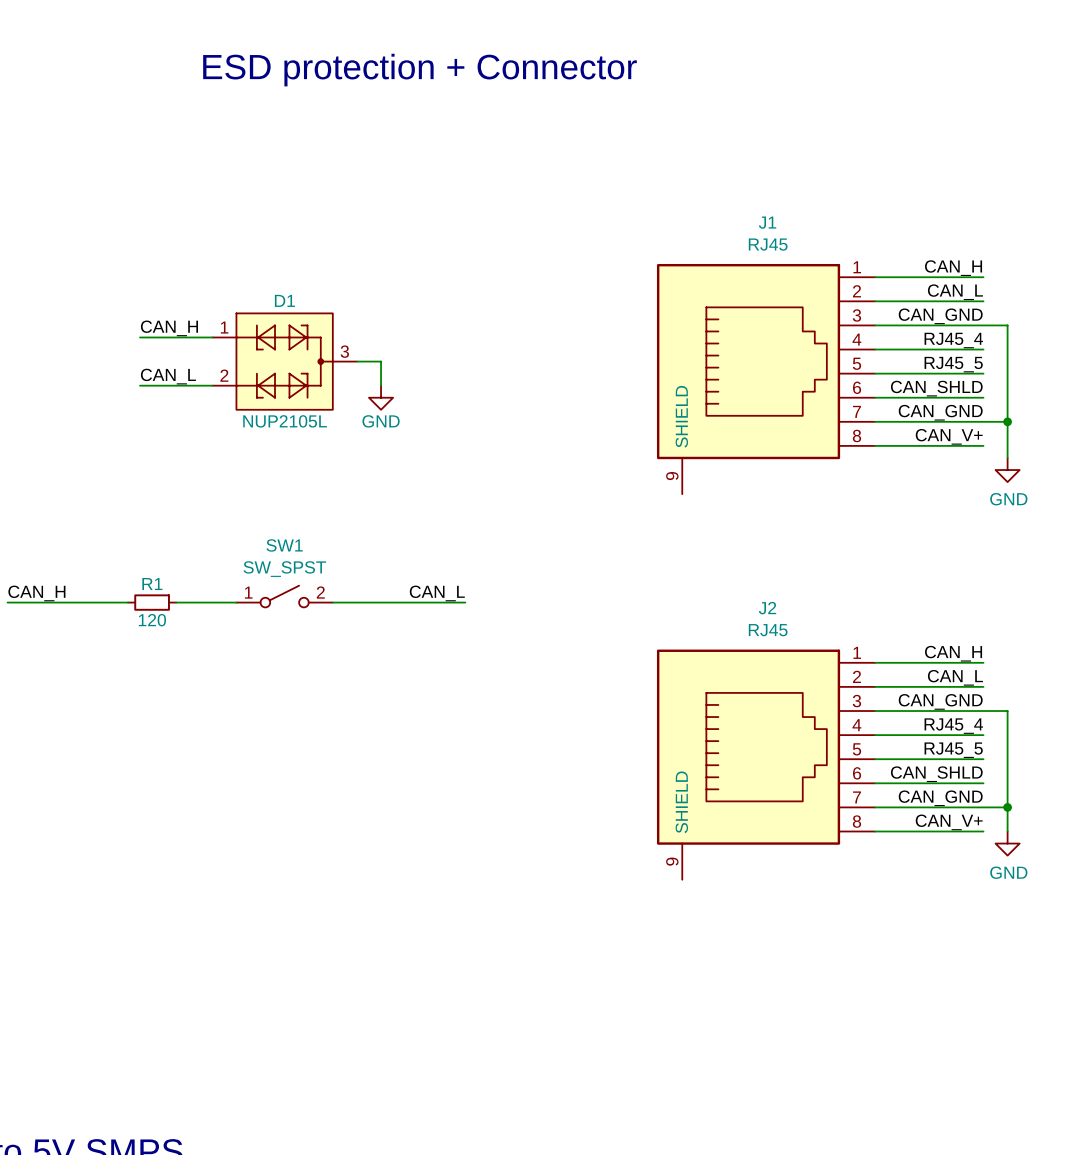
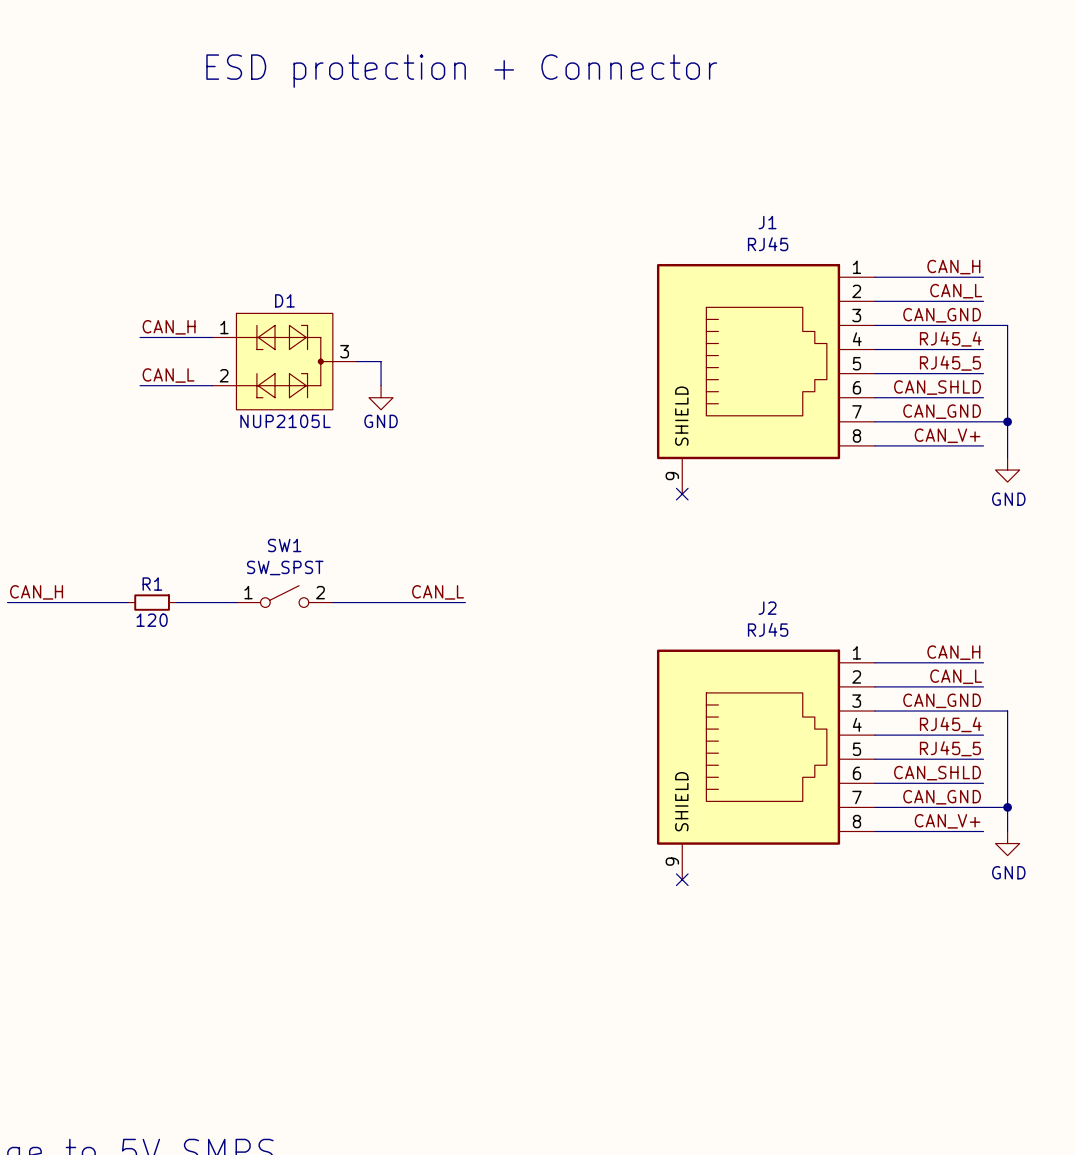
no-connect mark: none -> (682, 494)
no-connect mark: none -> (682, 879)

